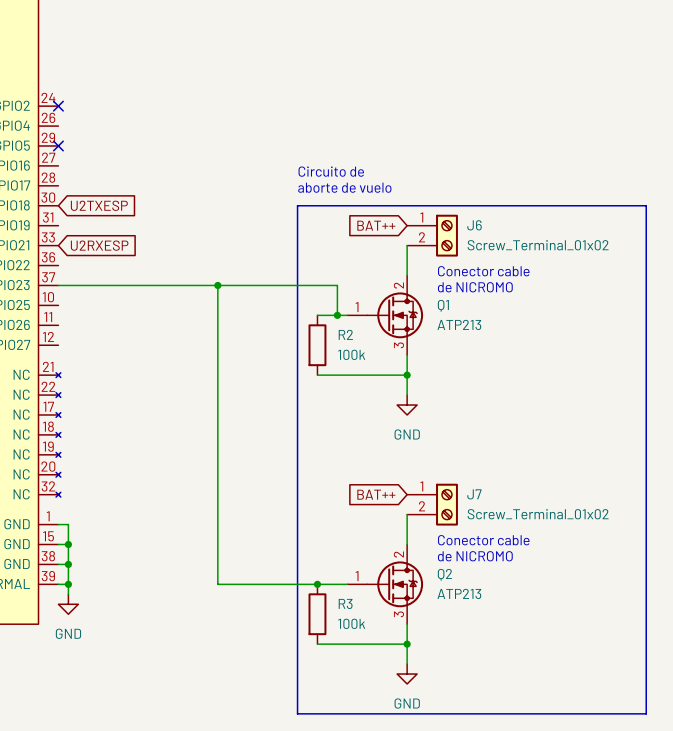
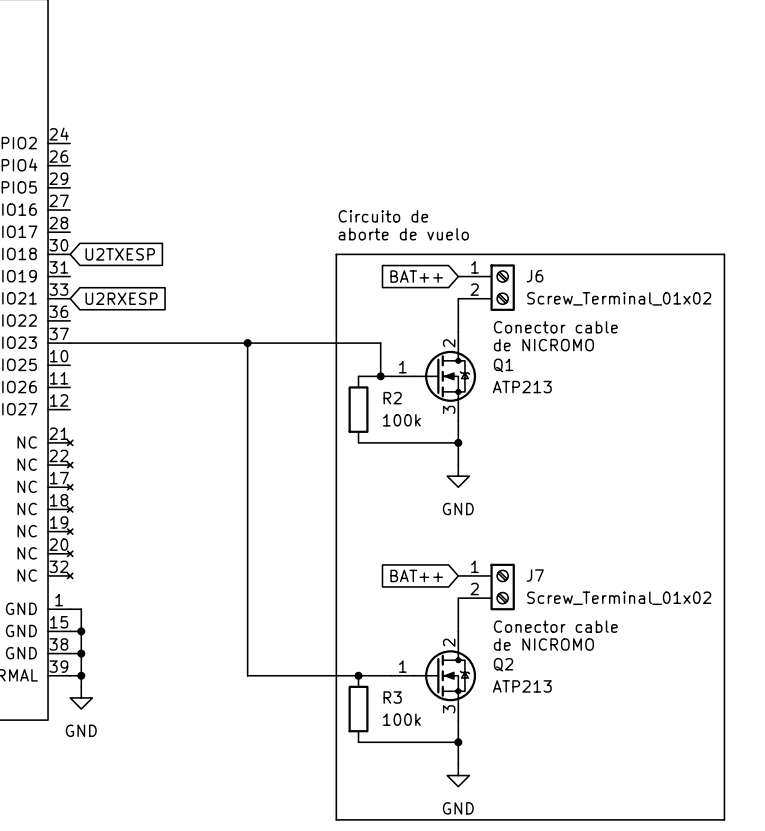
no-connect mark: (58, 106) -> none
no-connect mark: (58, 145) -> none

